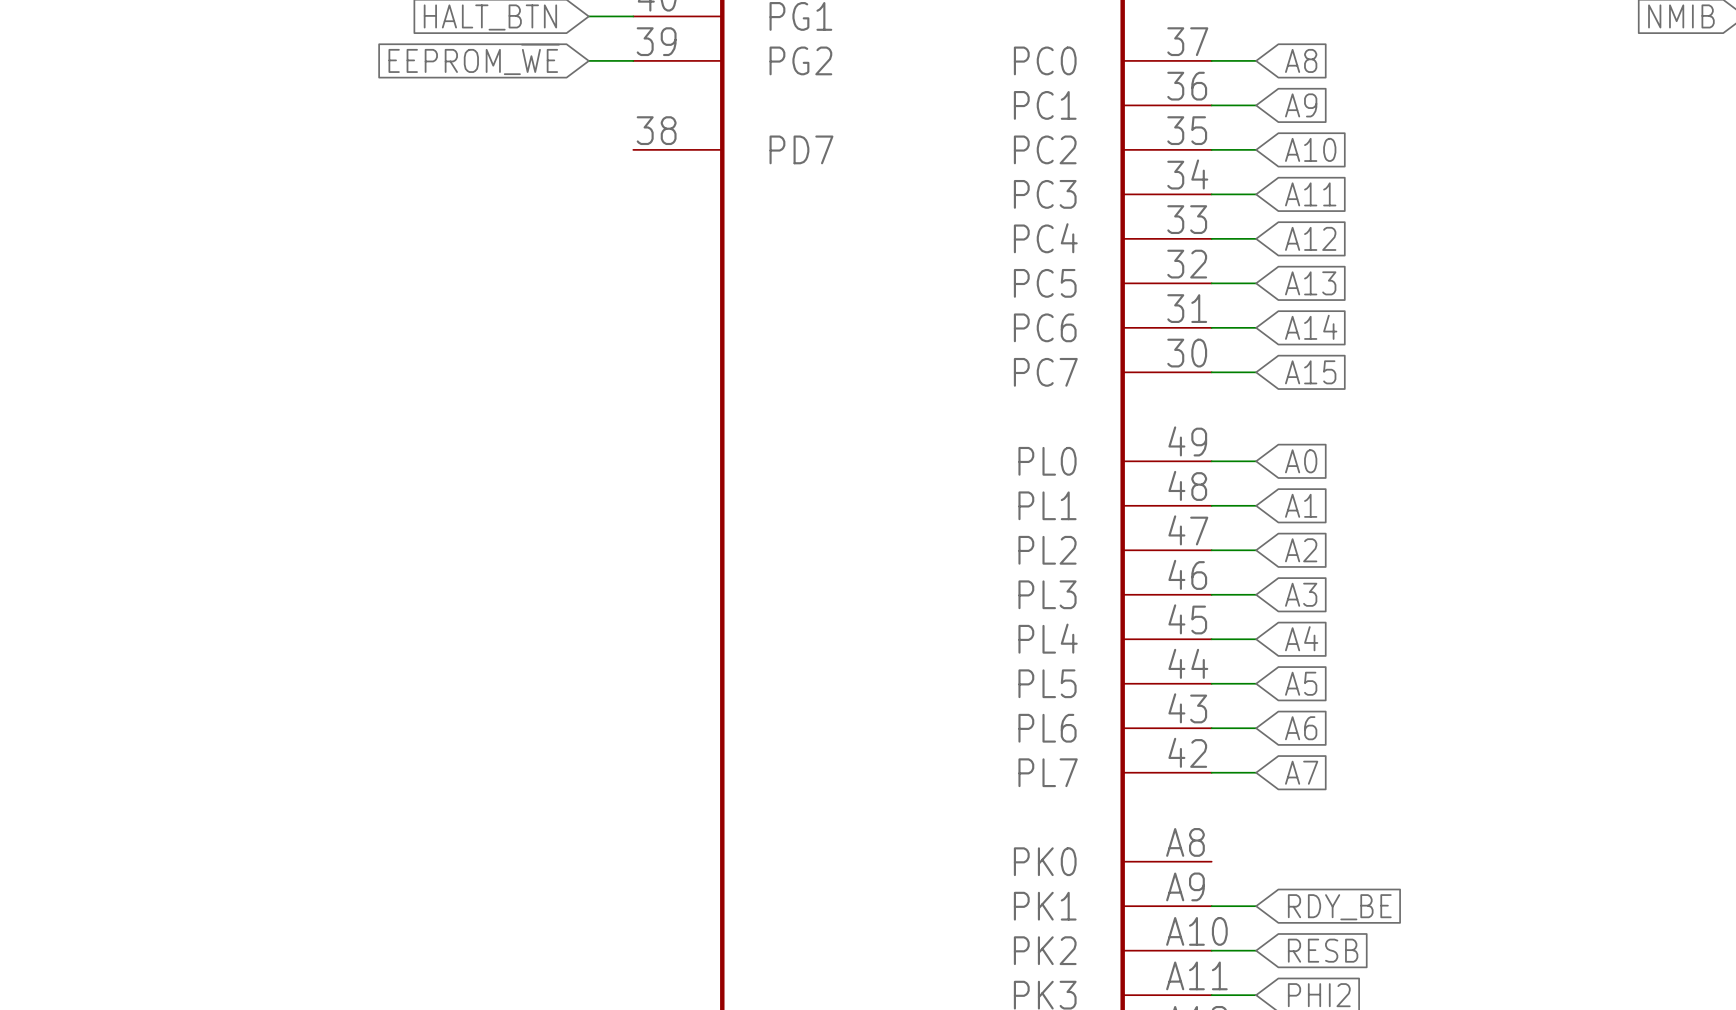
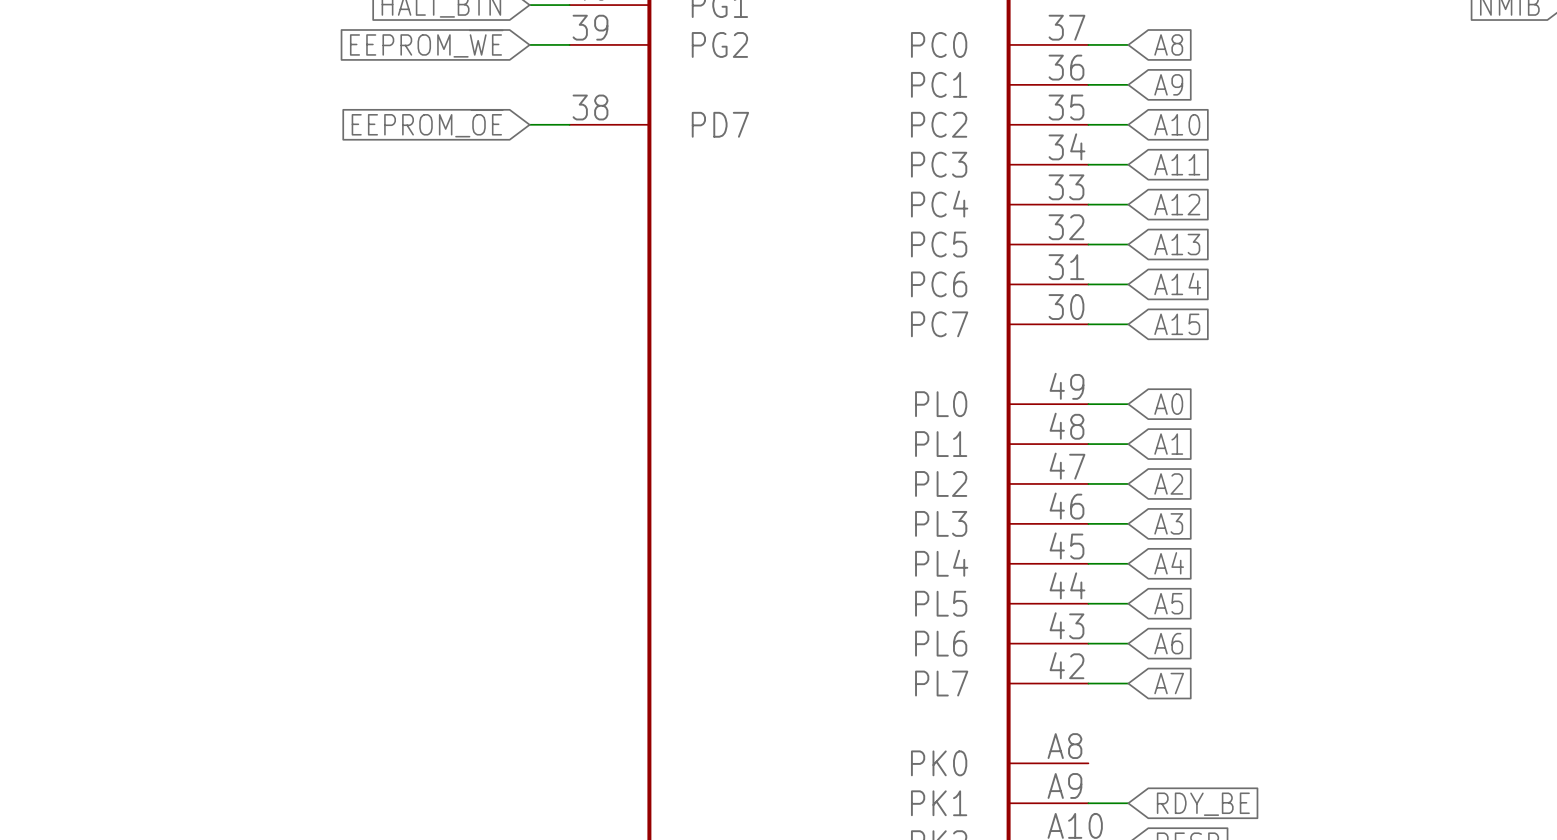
global label: none -> EEPROM_~{OE} (427, 123)
wire: none -> (529, 124) (569, 124)

